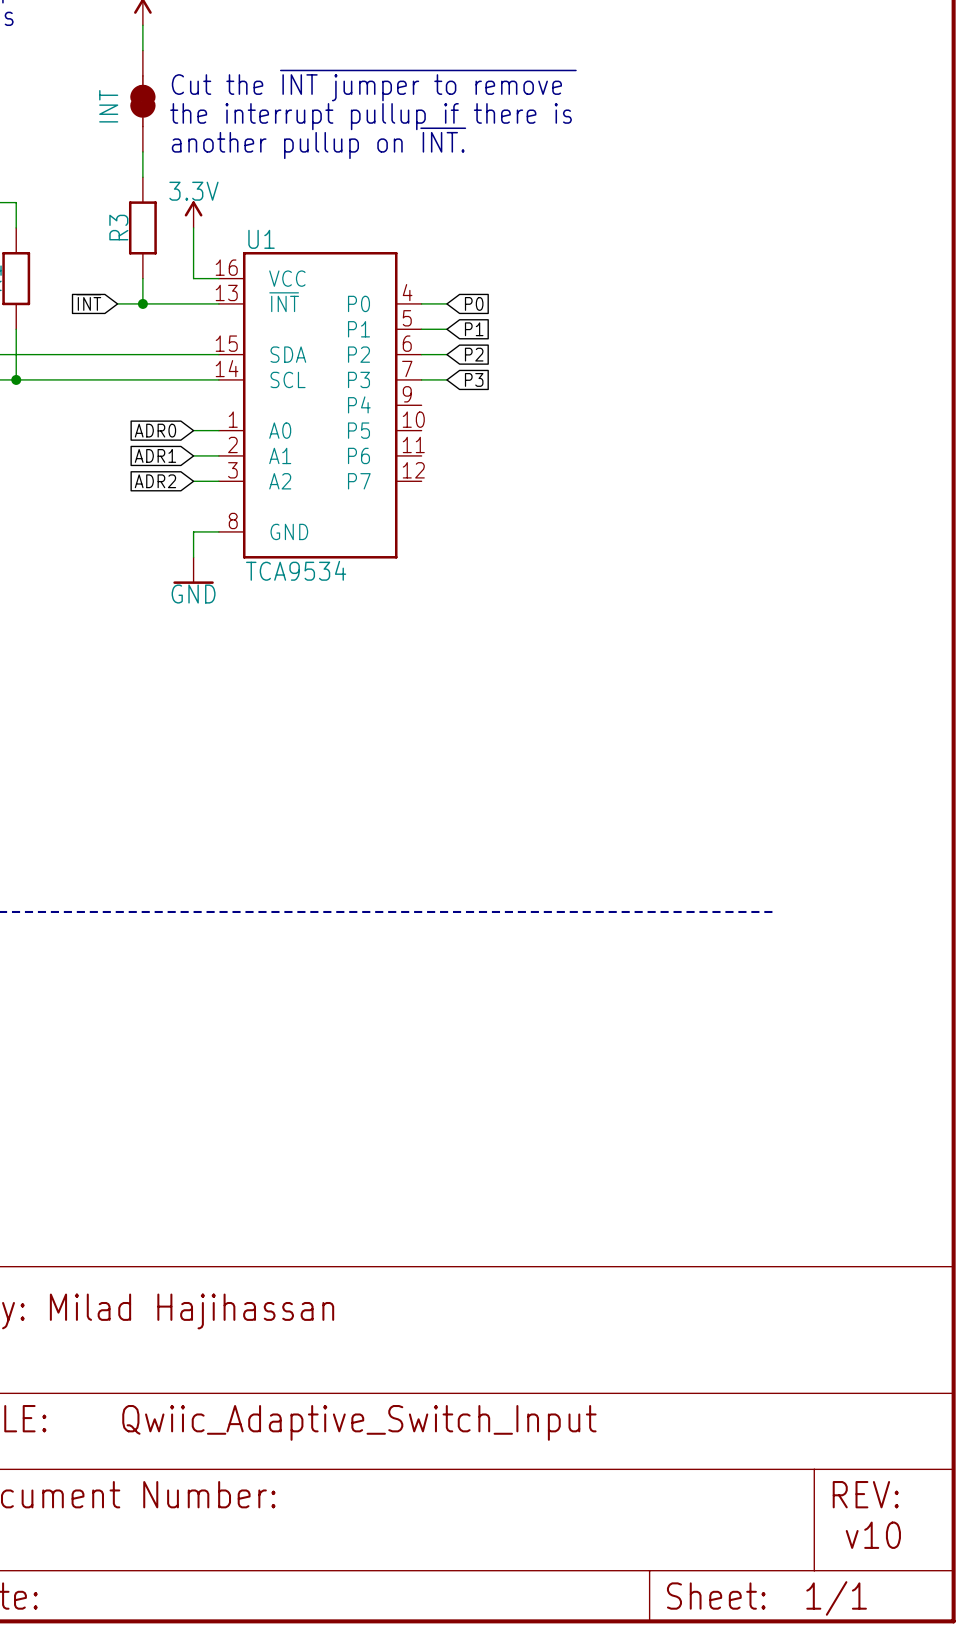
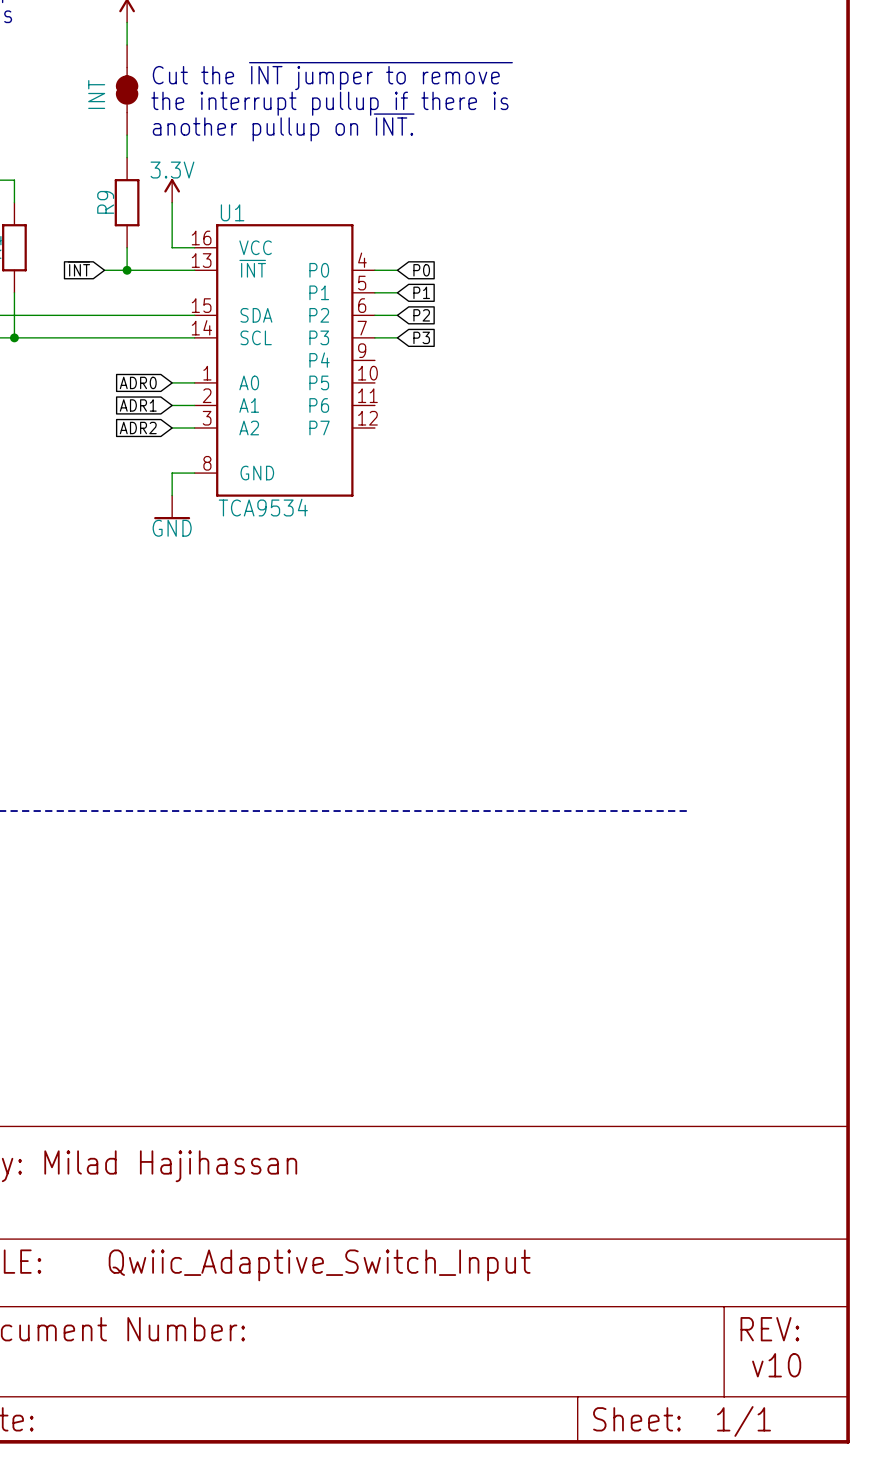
R3 name: R3 (118, 227) -> R9 (105, 202)

